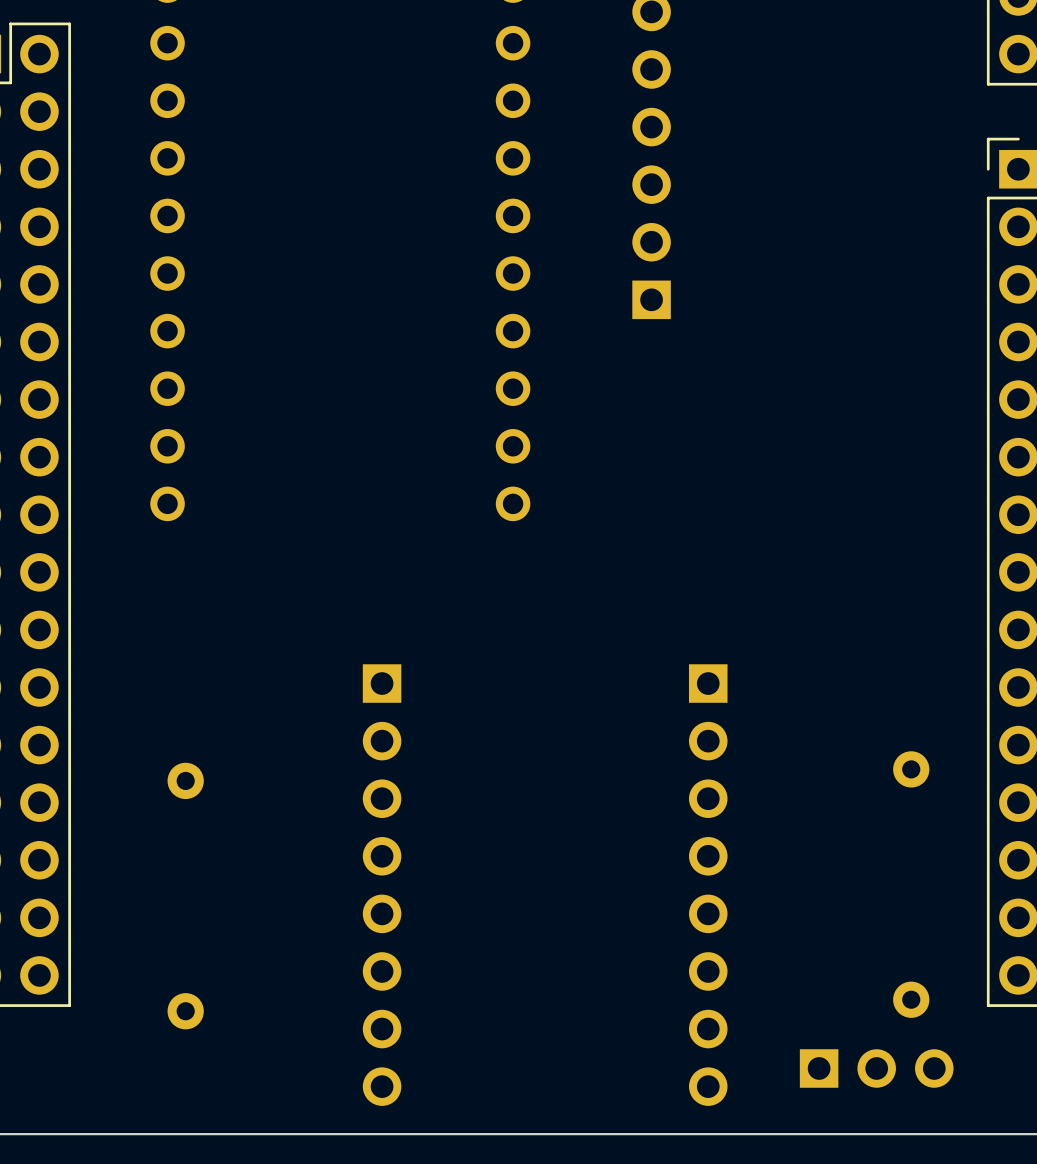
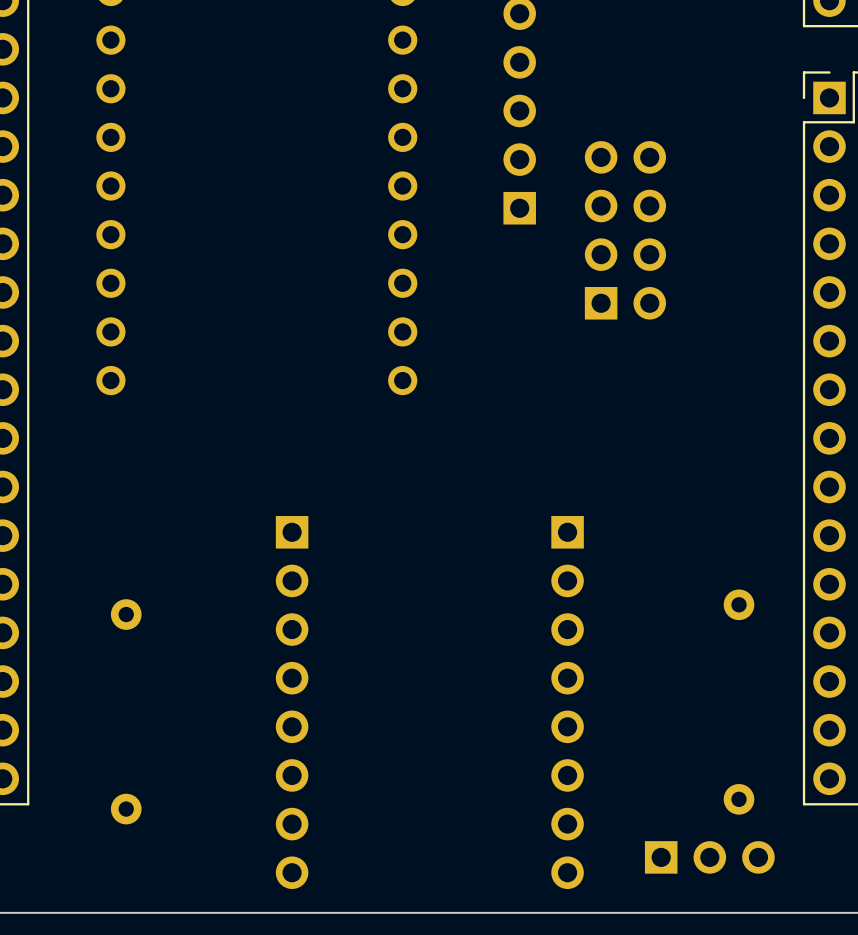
part: none -> (625, 230)

